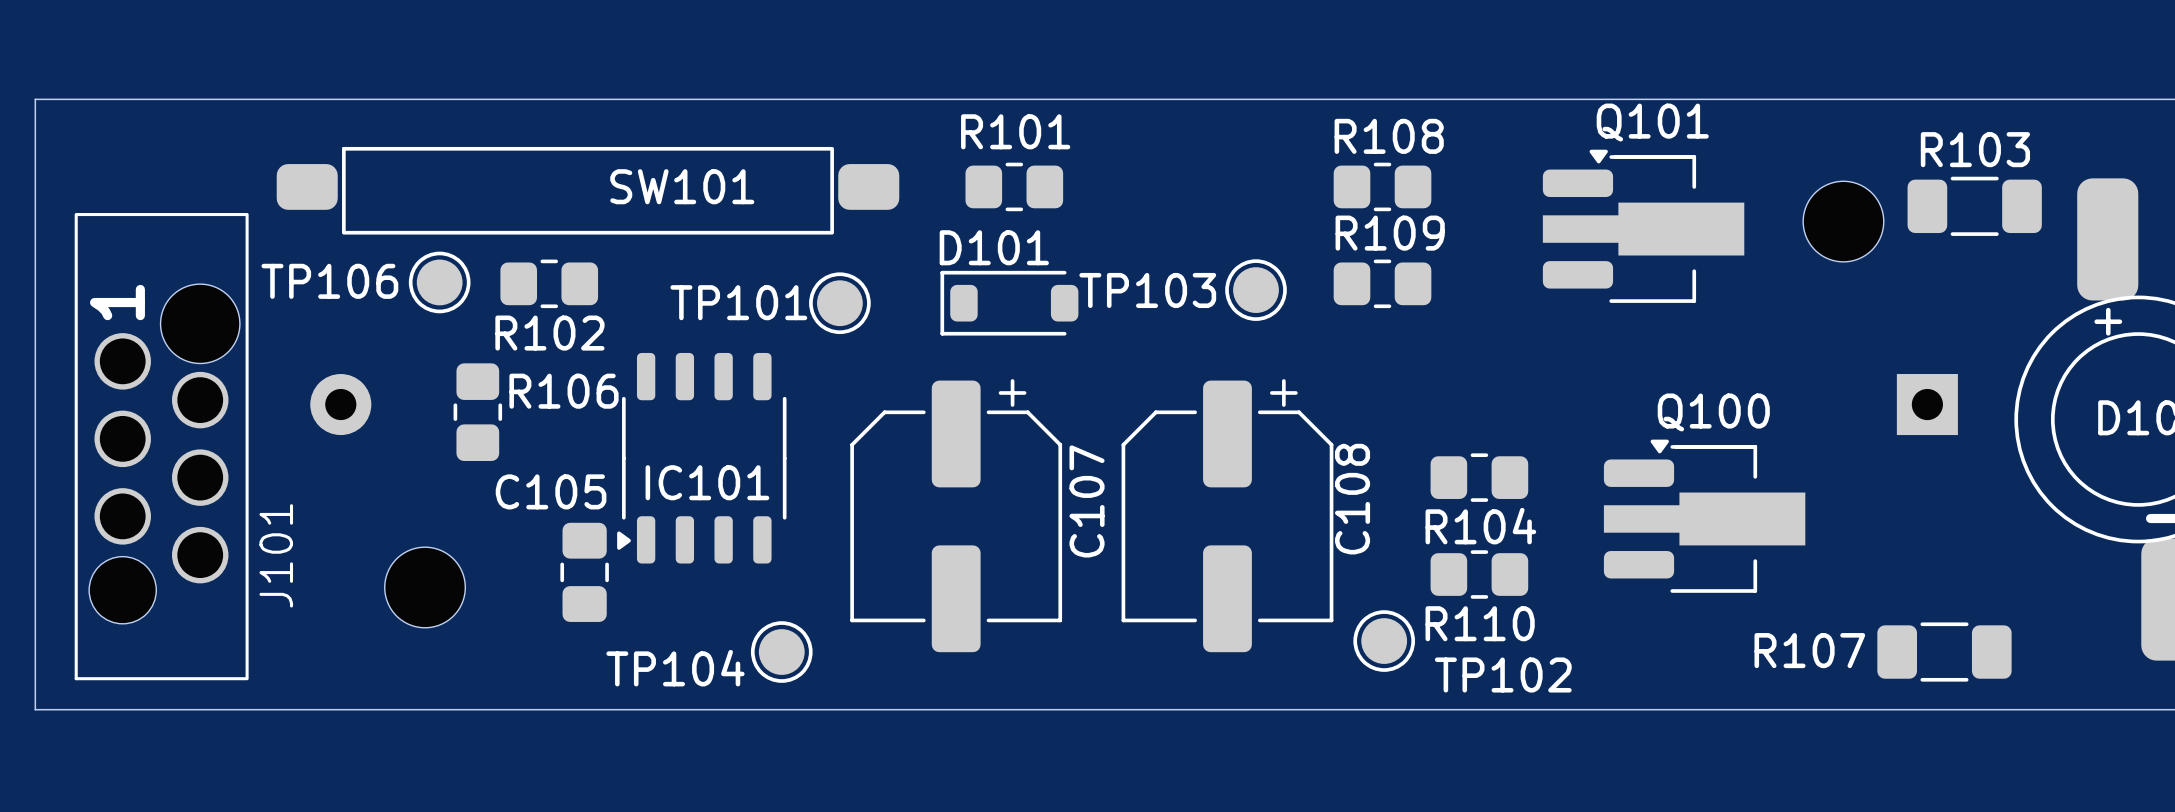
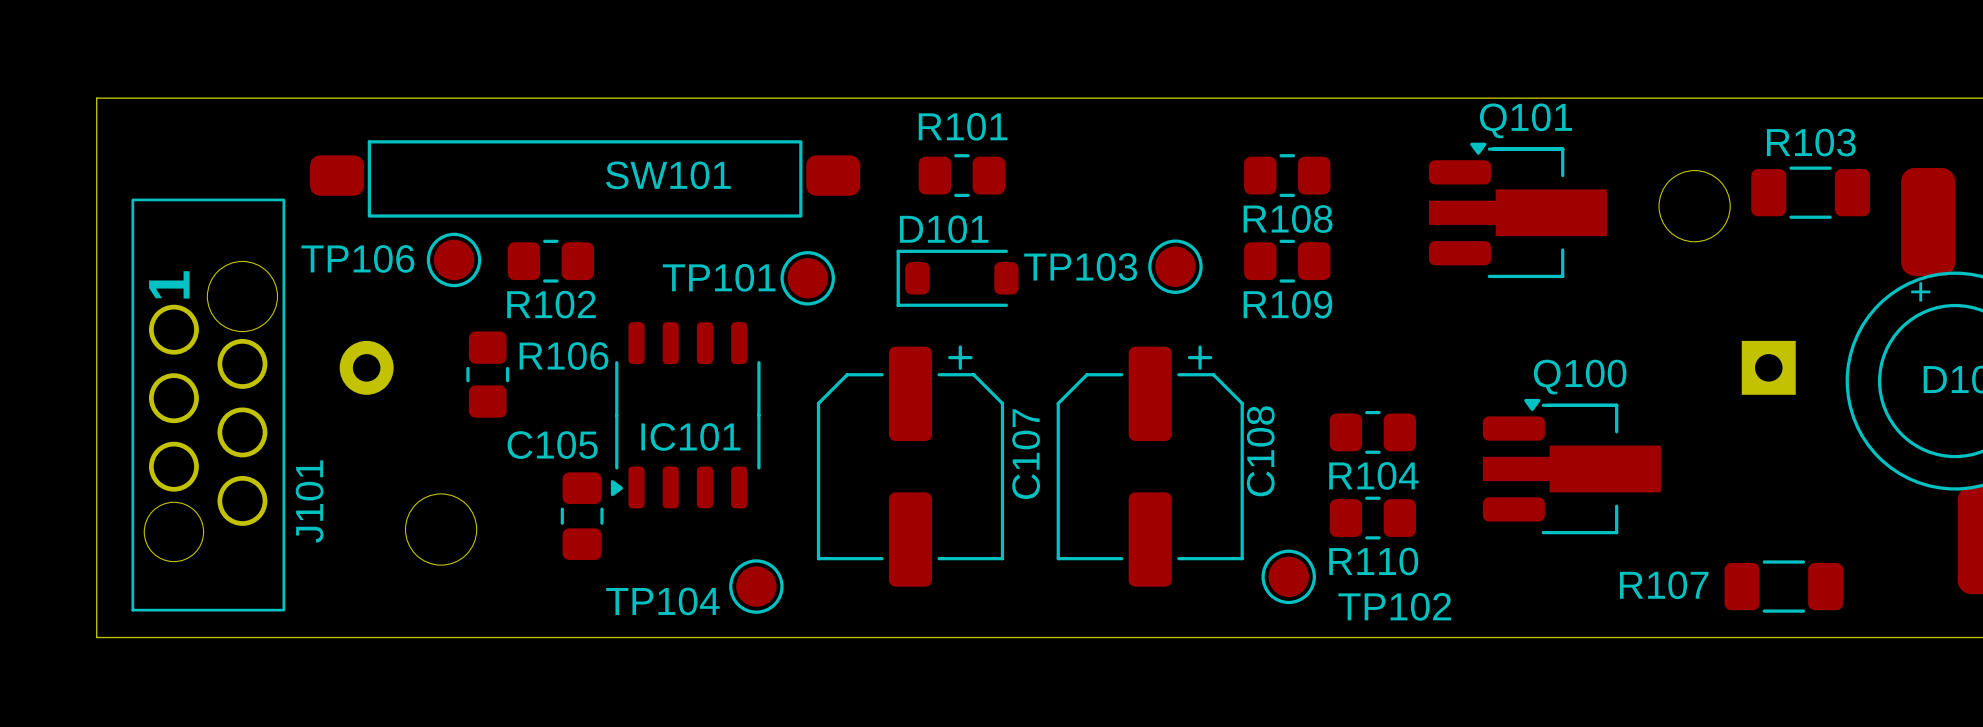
R108 name position: R108 (1389, 136) -> R108 (1287, 219)
R109 name position: R109 (1390, 233) -> R109 (1287, 304)

